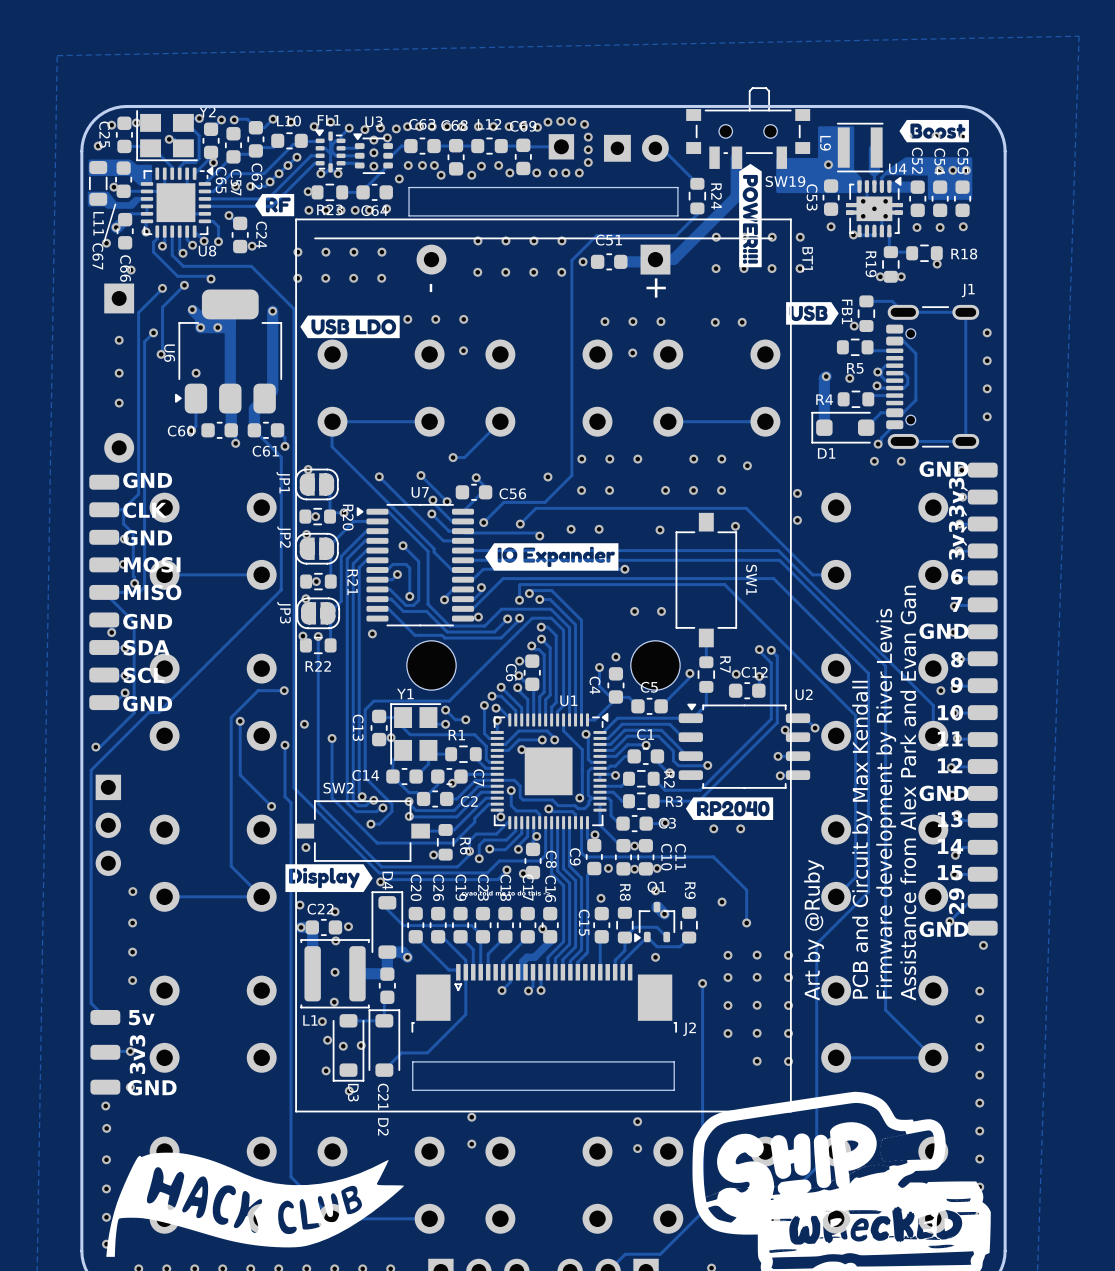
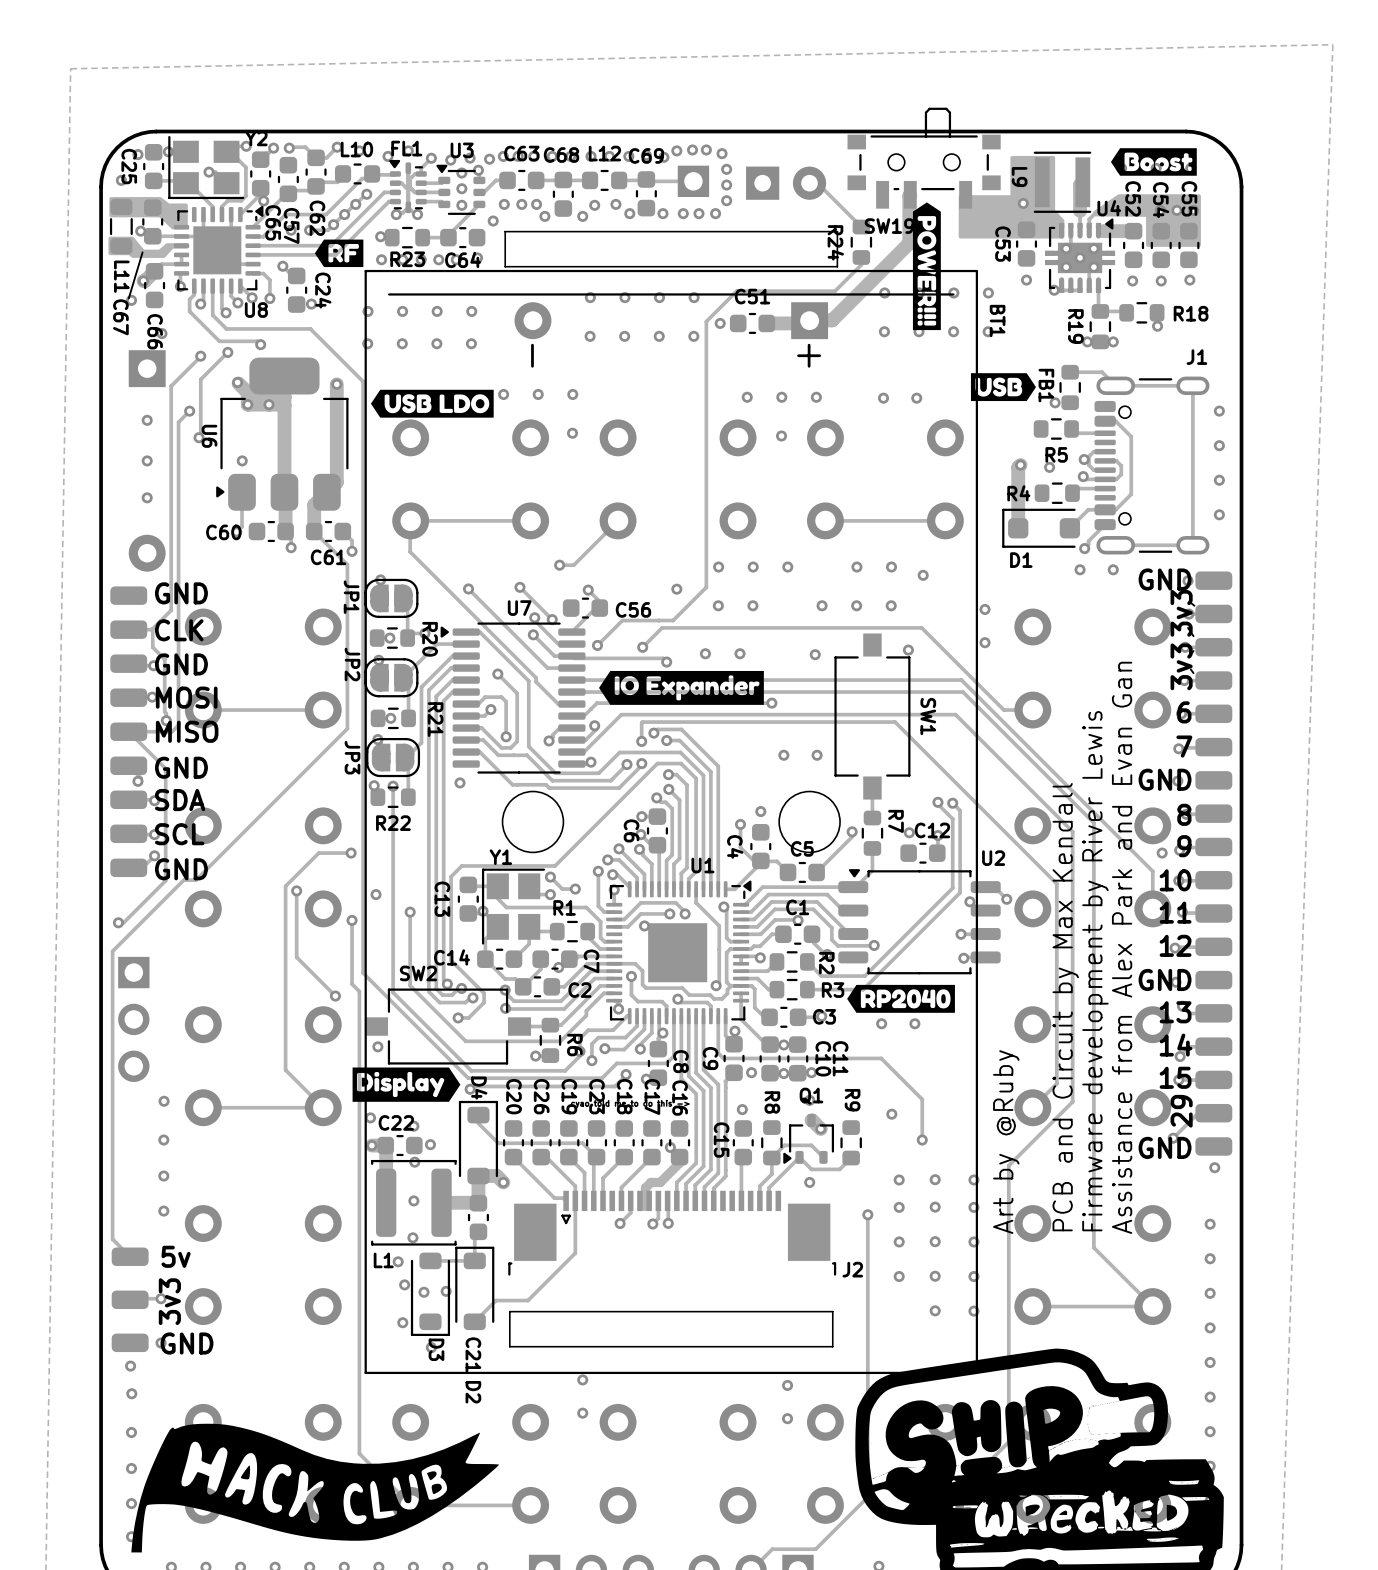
SW19 name position: SW19 (785, 181) -> SW19 (889, 226)
R24 name position: R24 (716, 196) -> R24 (835, 242)

